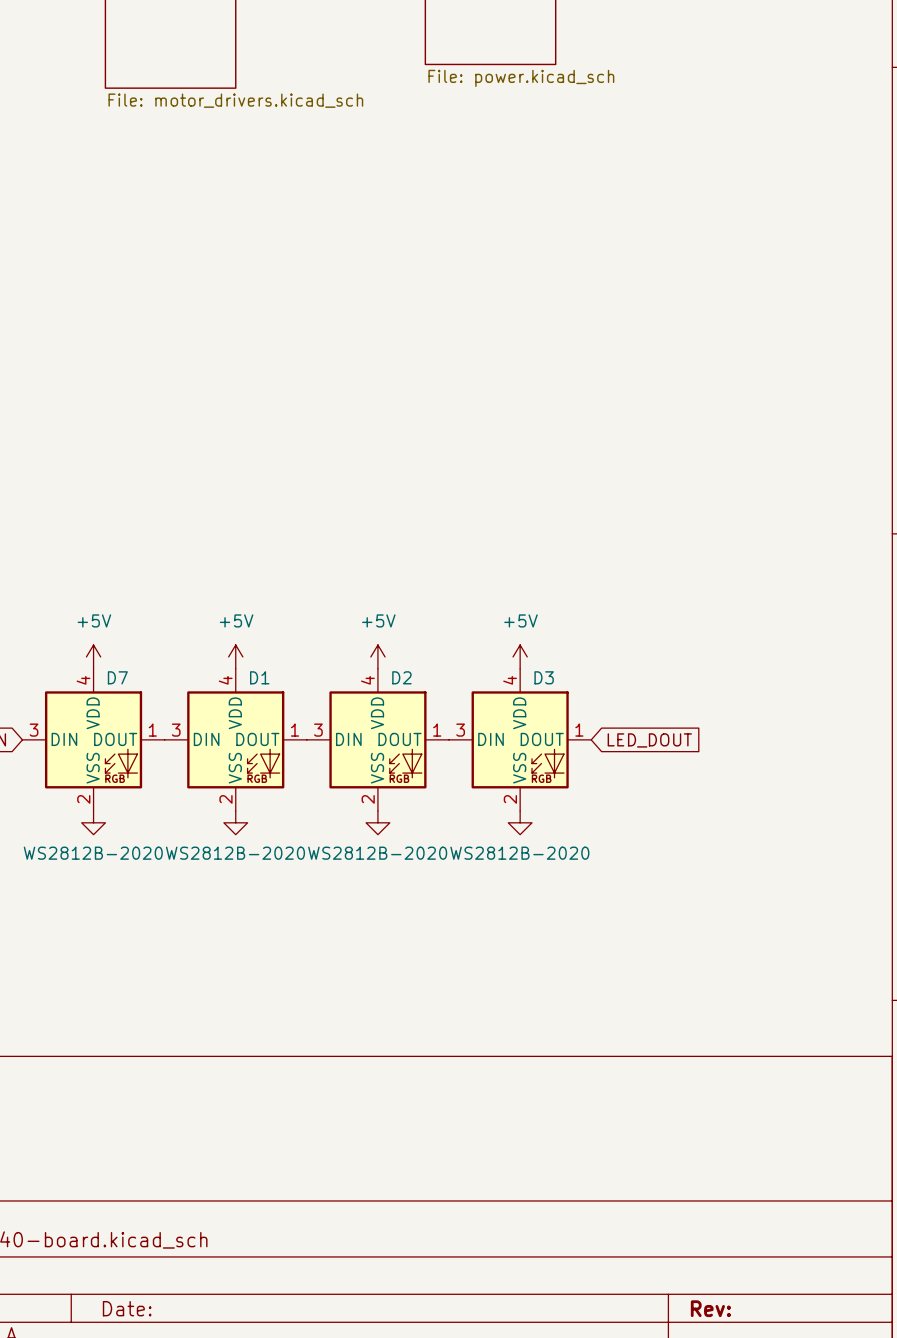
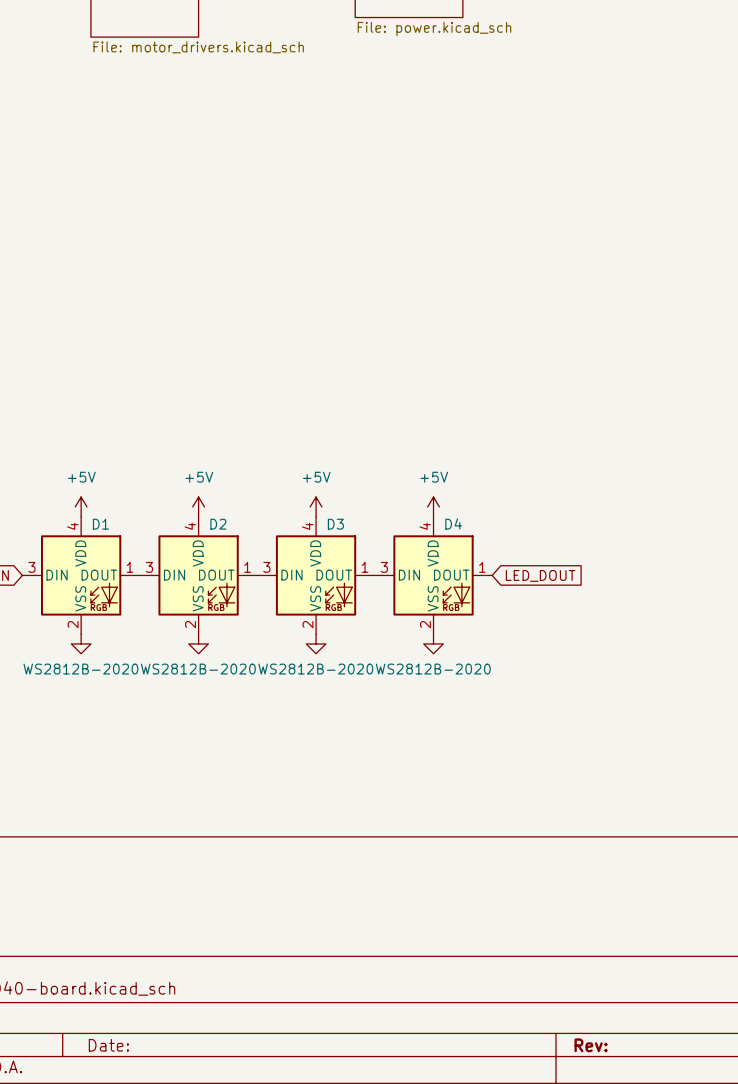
D7 name: D7 (117, 677) -> D1 (100, 524)
D1 name: D1 (259, 677) -> D2 (218, 524)
D2 name: D2 (401, 677) -> D3 (335, 524)
D3 name: D3 (544, 677) -> D4 (453, 523)

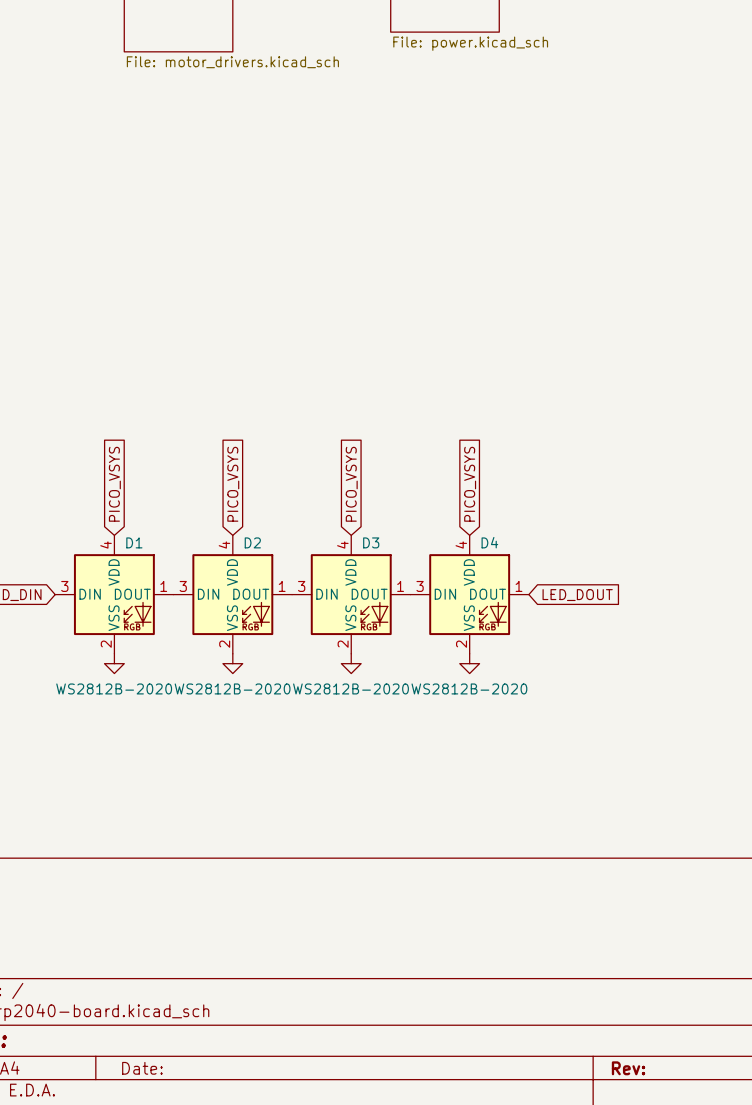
global label: none -> PICO_VSYS (114, 484)
global label: none -> PICO_VSYS (233, 484)
global label: none -> PICO_VSYS (351, 484)
global label: none -> PICO_VSYS (470, 484)
power symbol: +5V (81, 506) -> none
power symbol: +5V (198, 506) -> none
power symbol: +5V (316, 506) -> none
power symbol: +5V (433, 506) -> none

